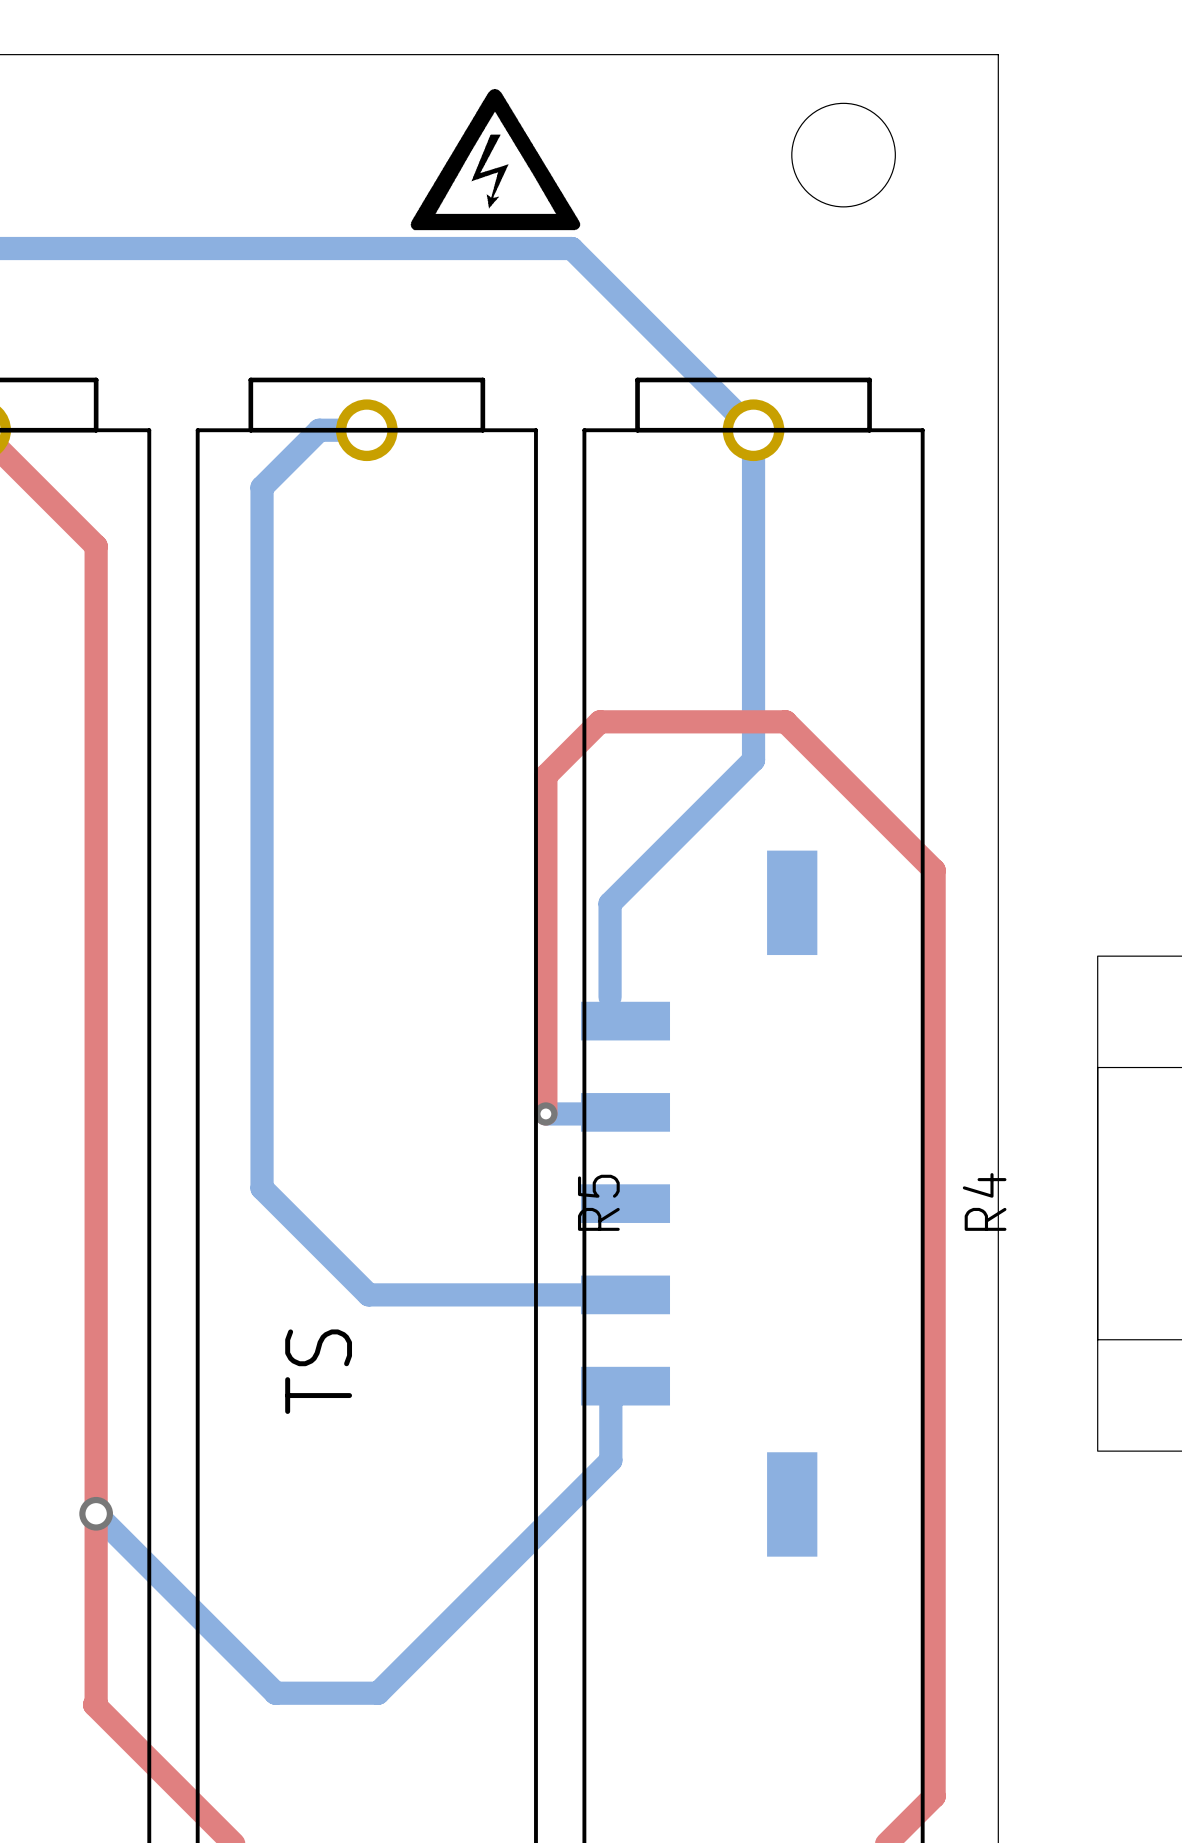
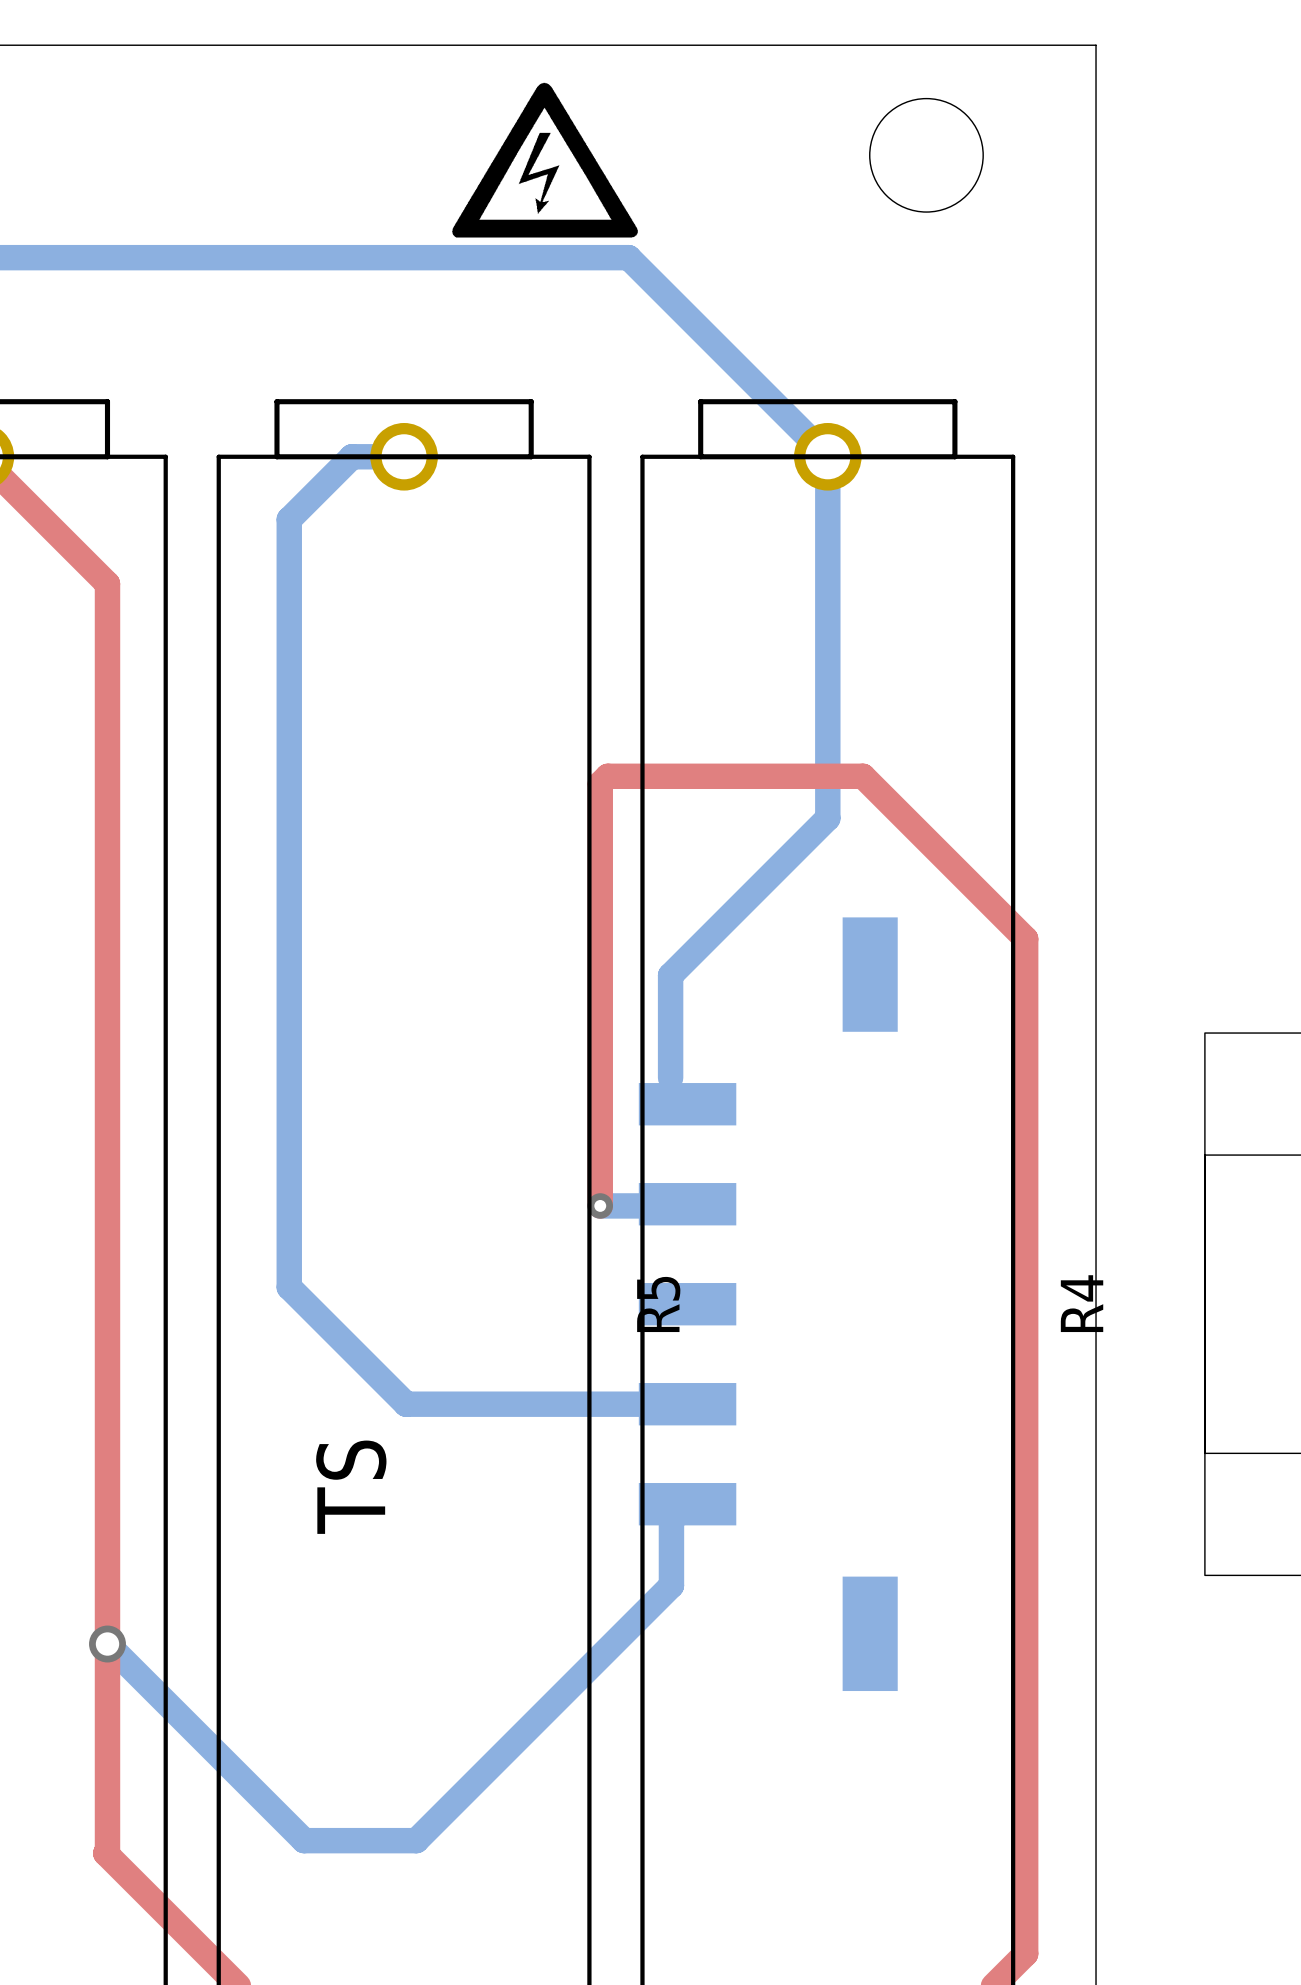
top track: (600, 721) (545, 775) -> (659, 776) (607, 776) (600, 783) (600, 835)

